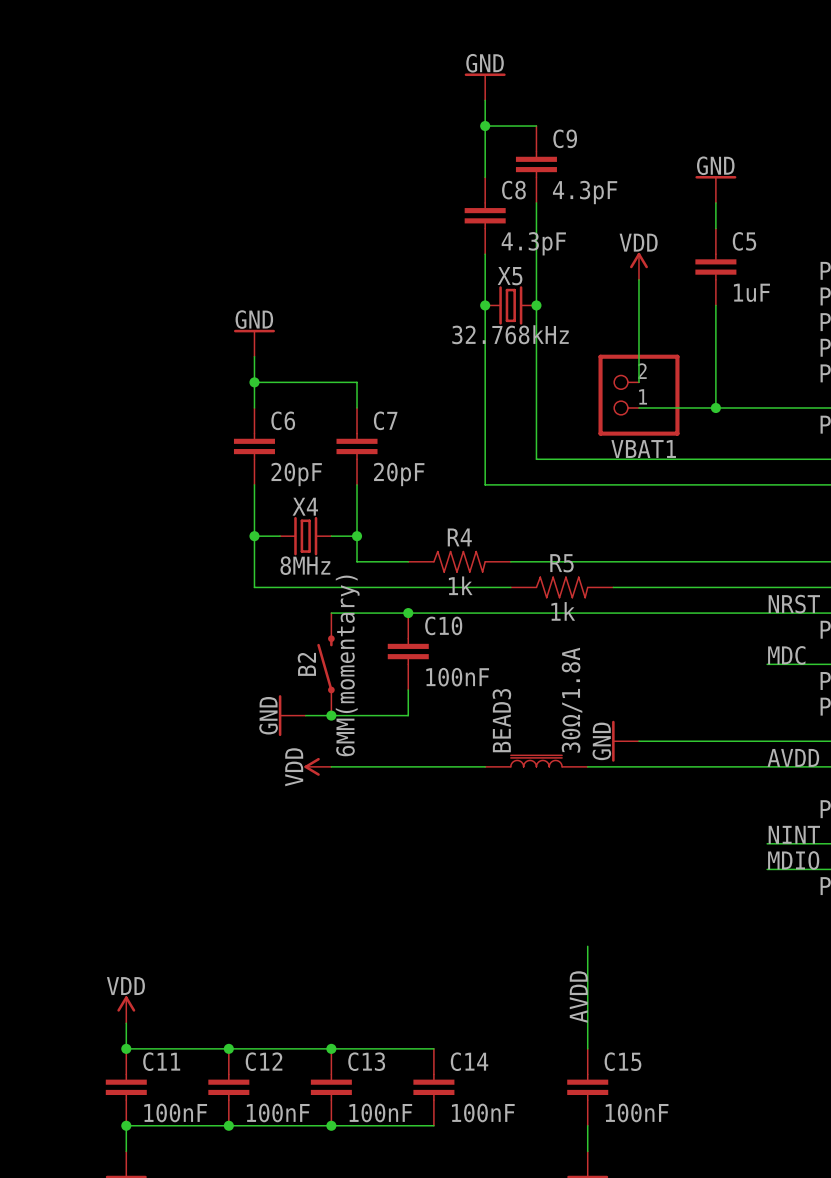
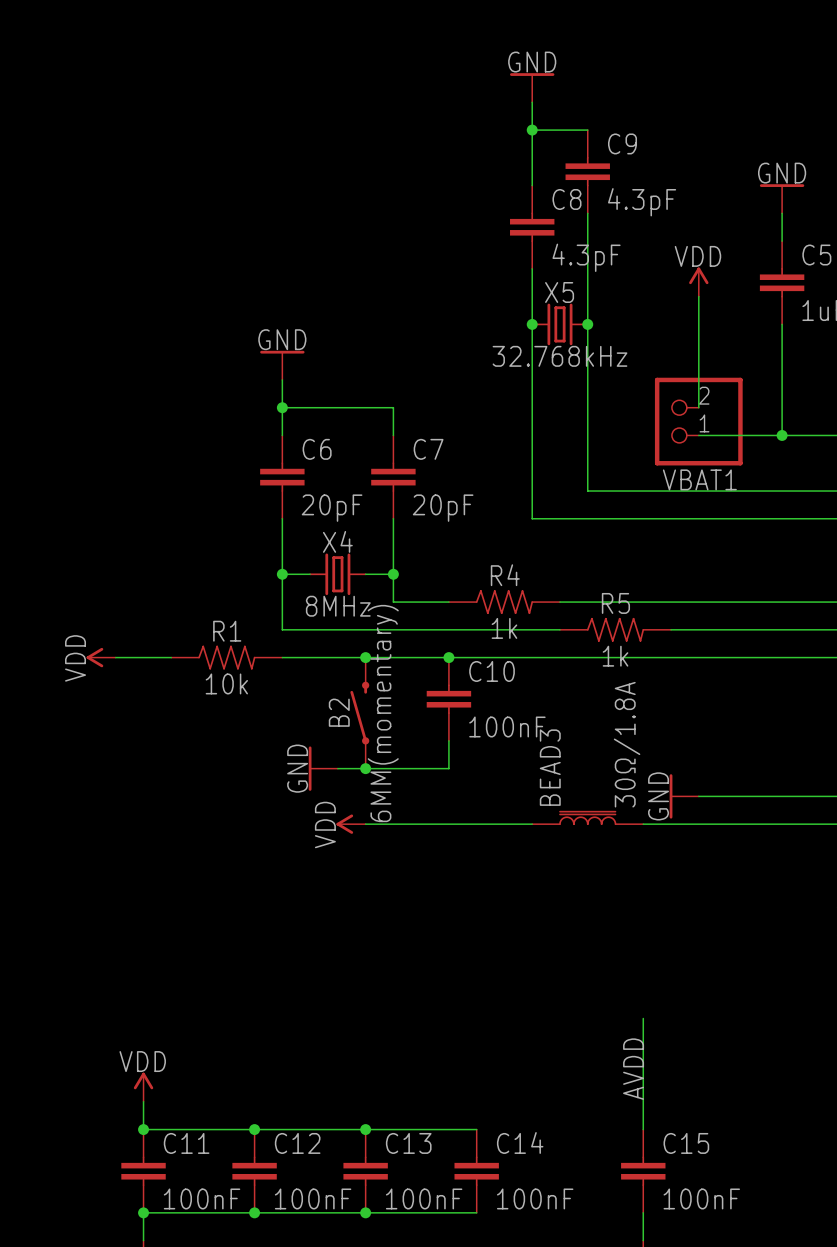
power symbol: none -> VDD (101, 657)
wire: none -> (115, 657) (171, 657)
R1: none -> 10k (226, 657)
wire: none -> (282, 657) (365, 657)
junction: none -> (365, 657)

